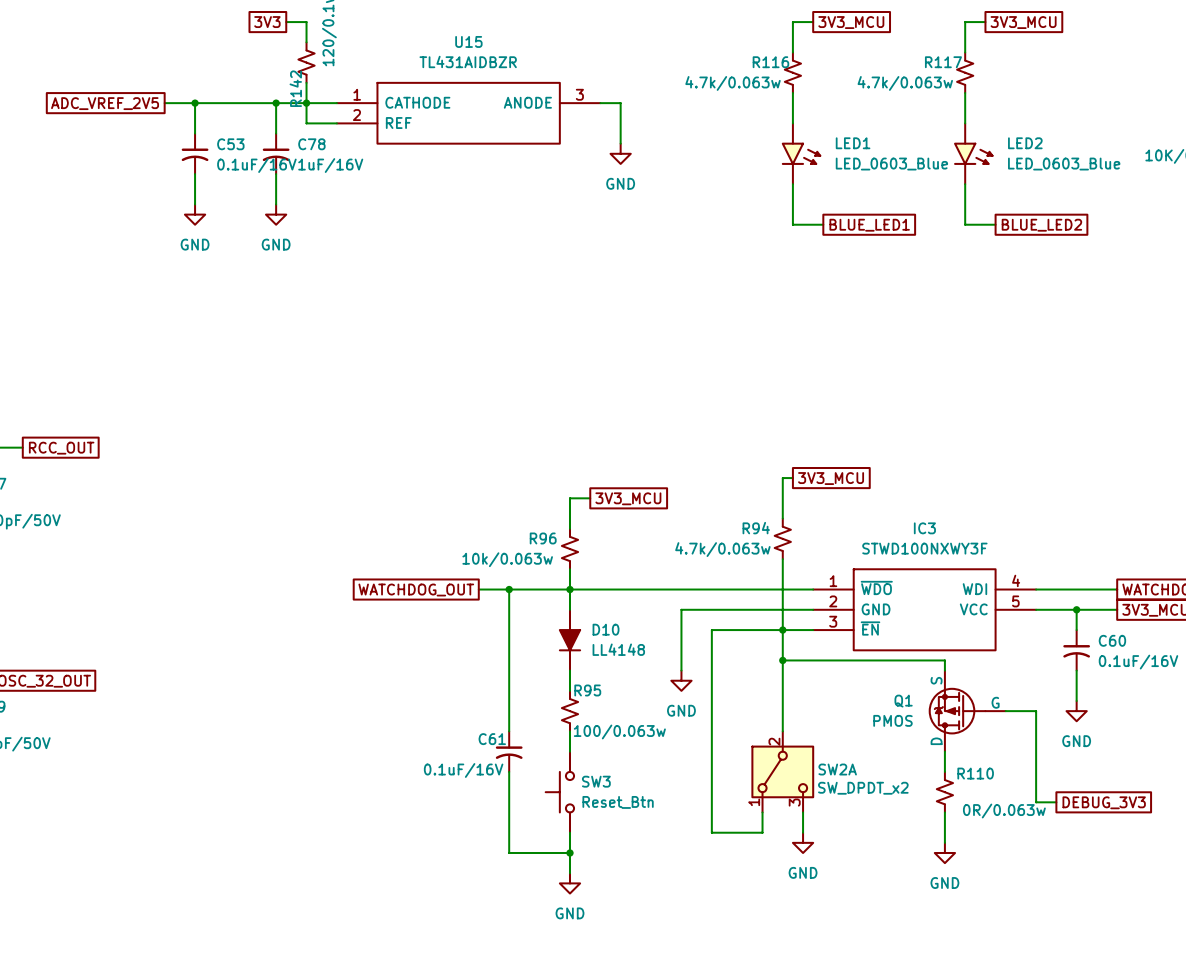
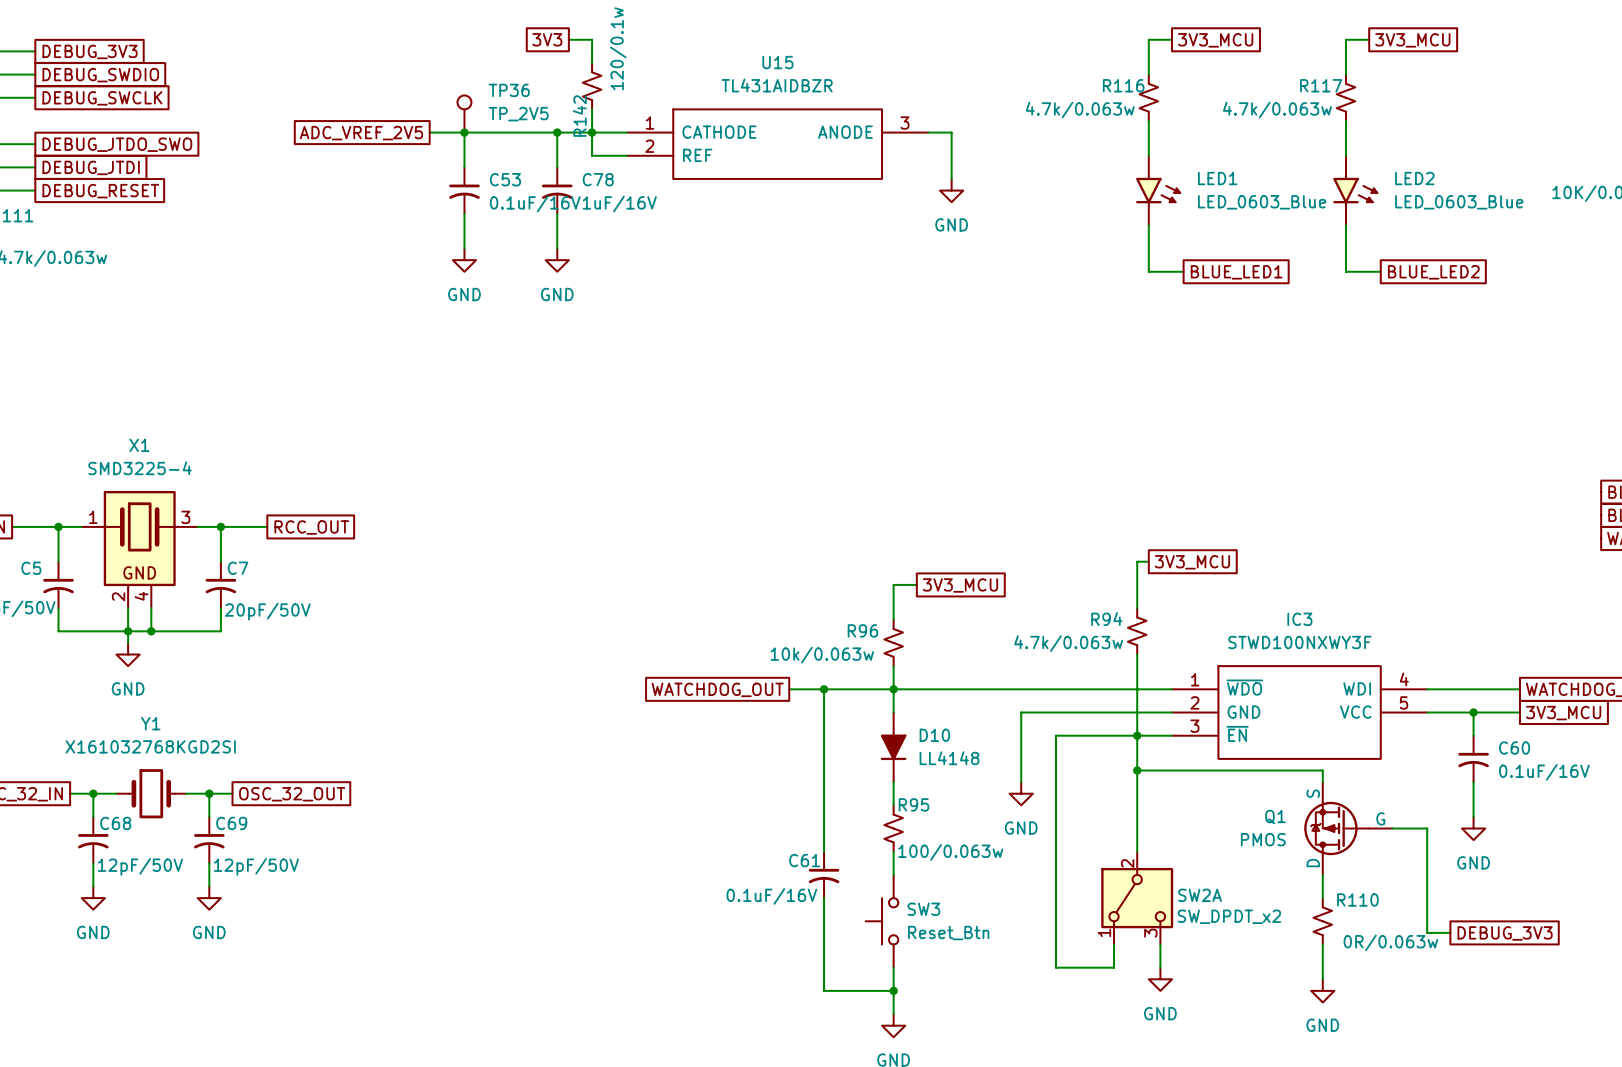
TP36: none -> TP_2V5 (464, 114)

